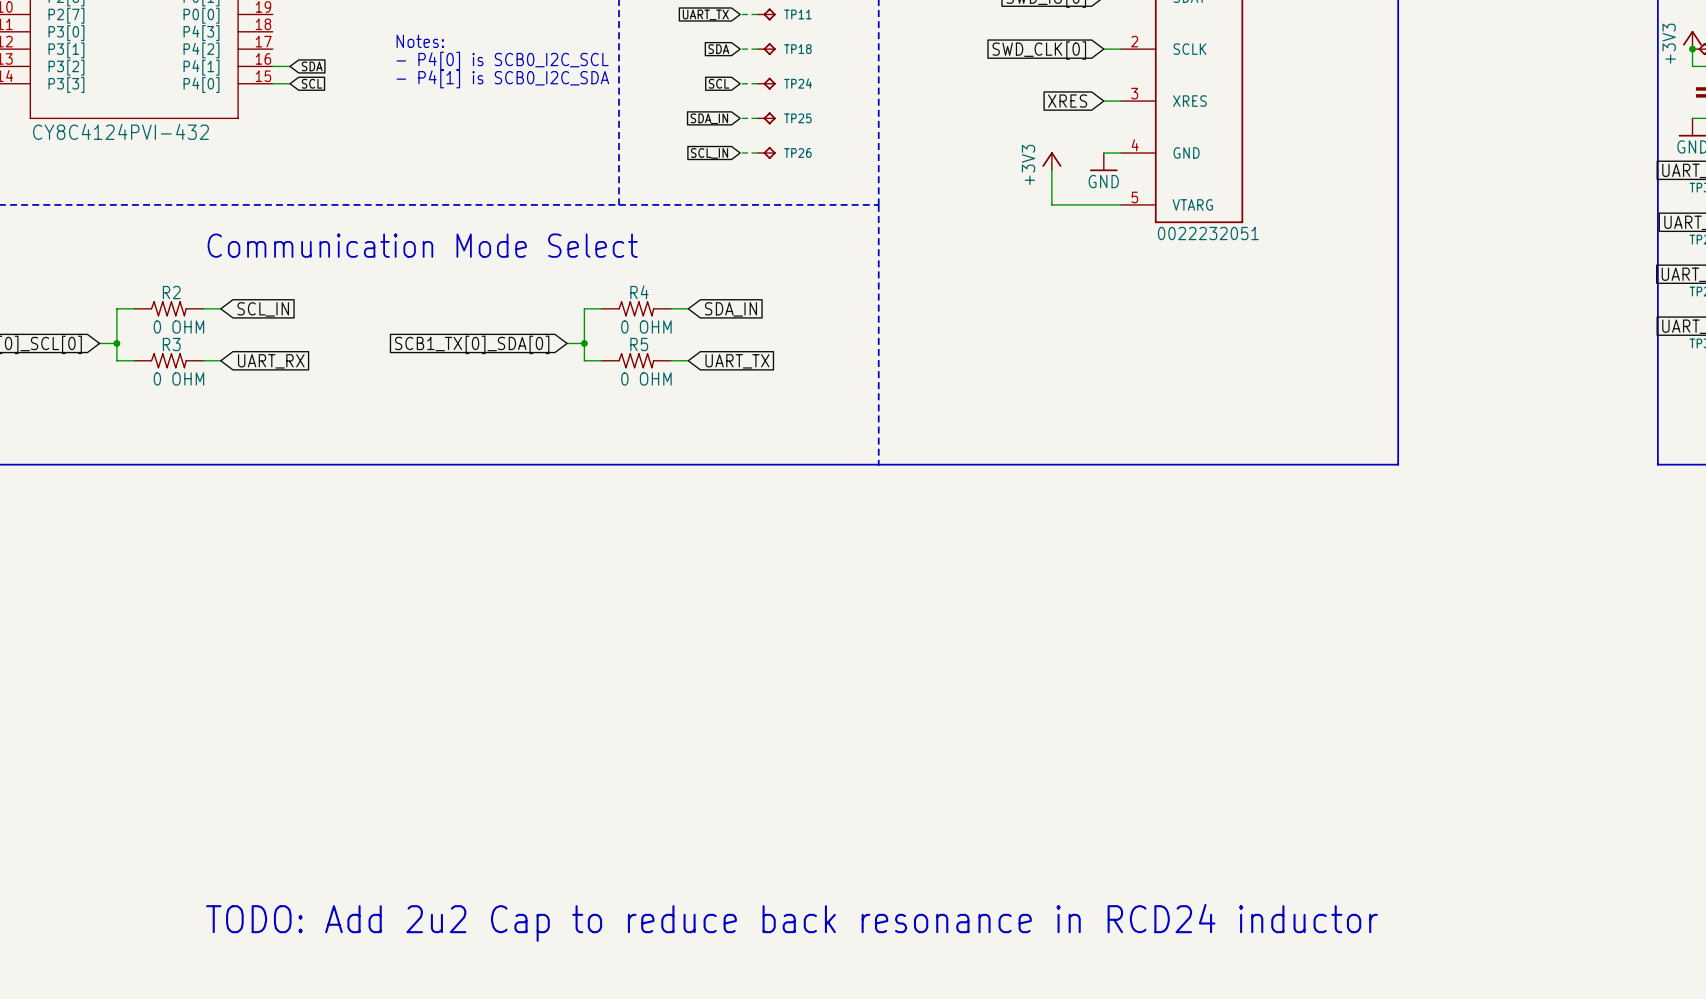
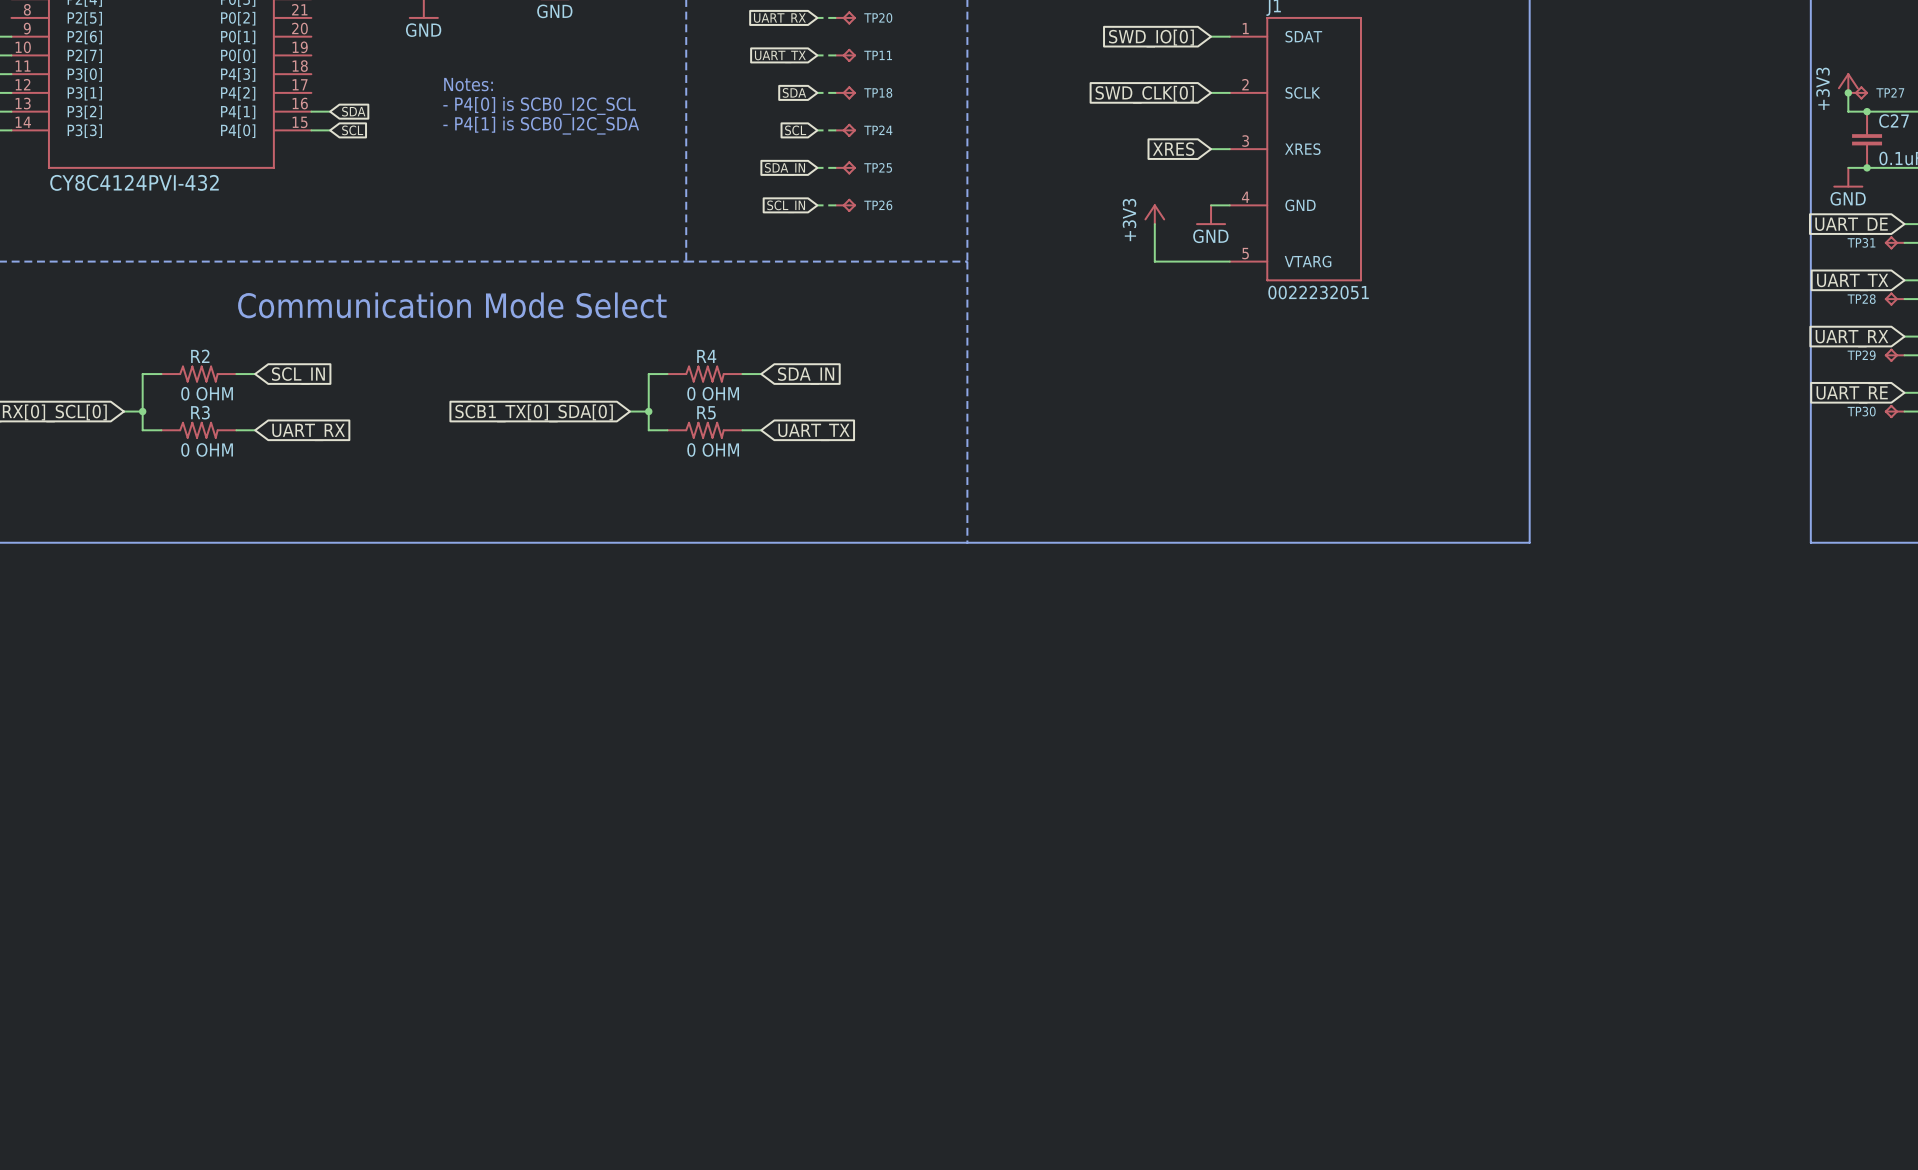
text: TODO: Add 2u2 Cap to reduce back resonance in RCD24 inductor (791, 922) -> none

